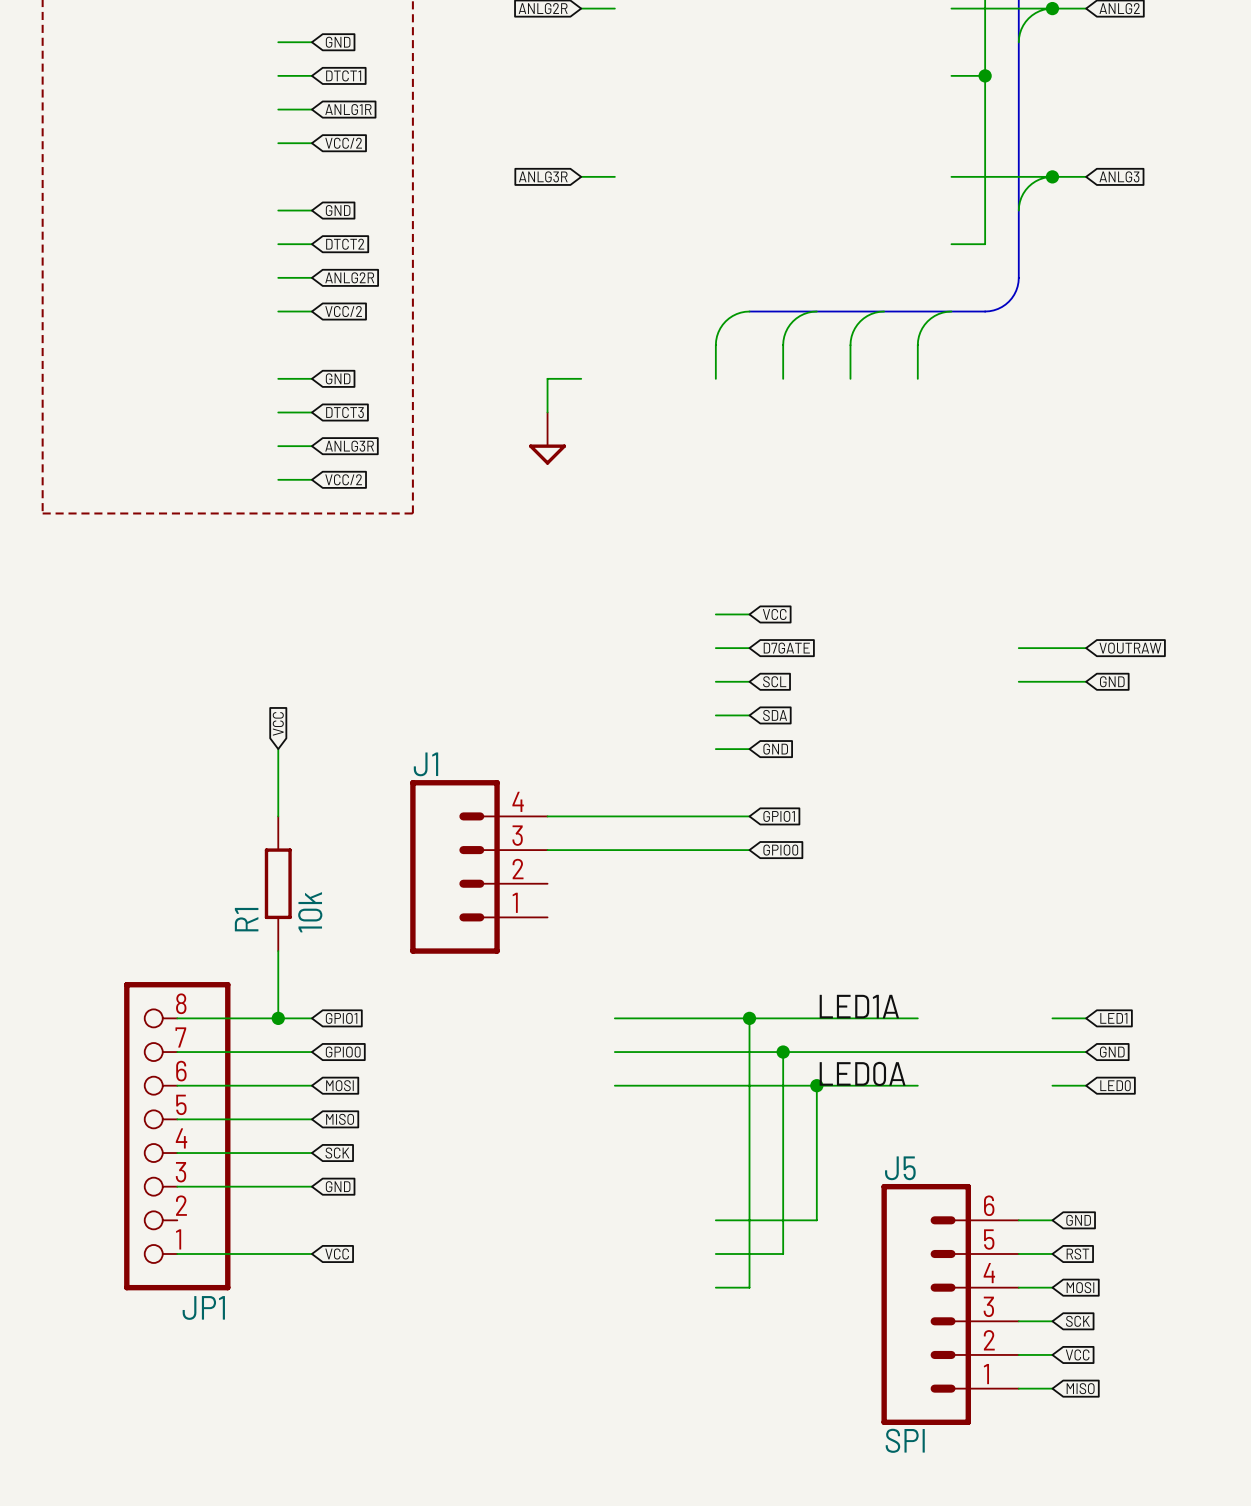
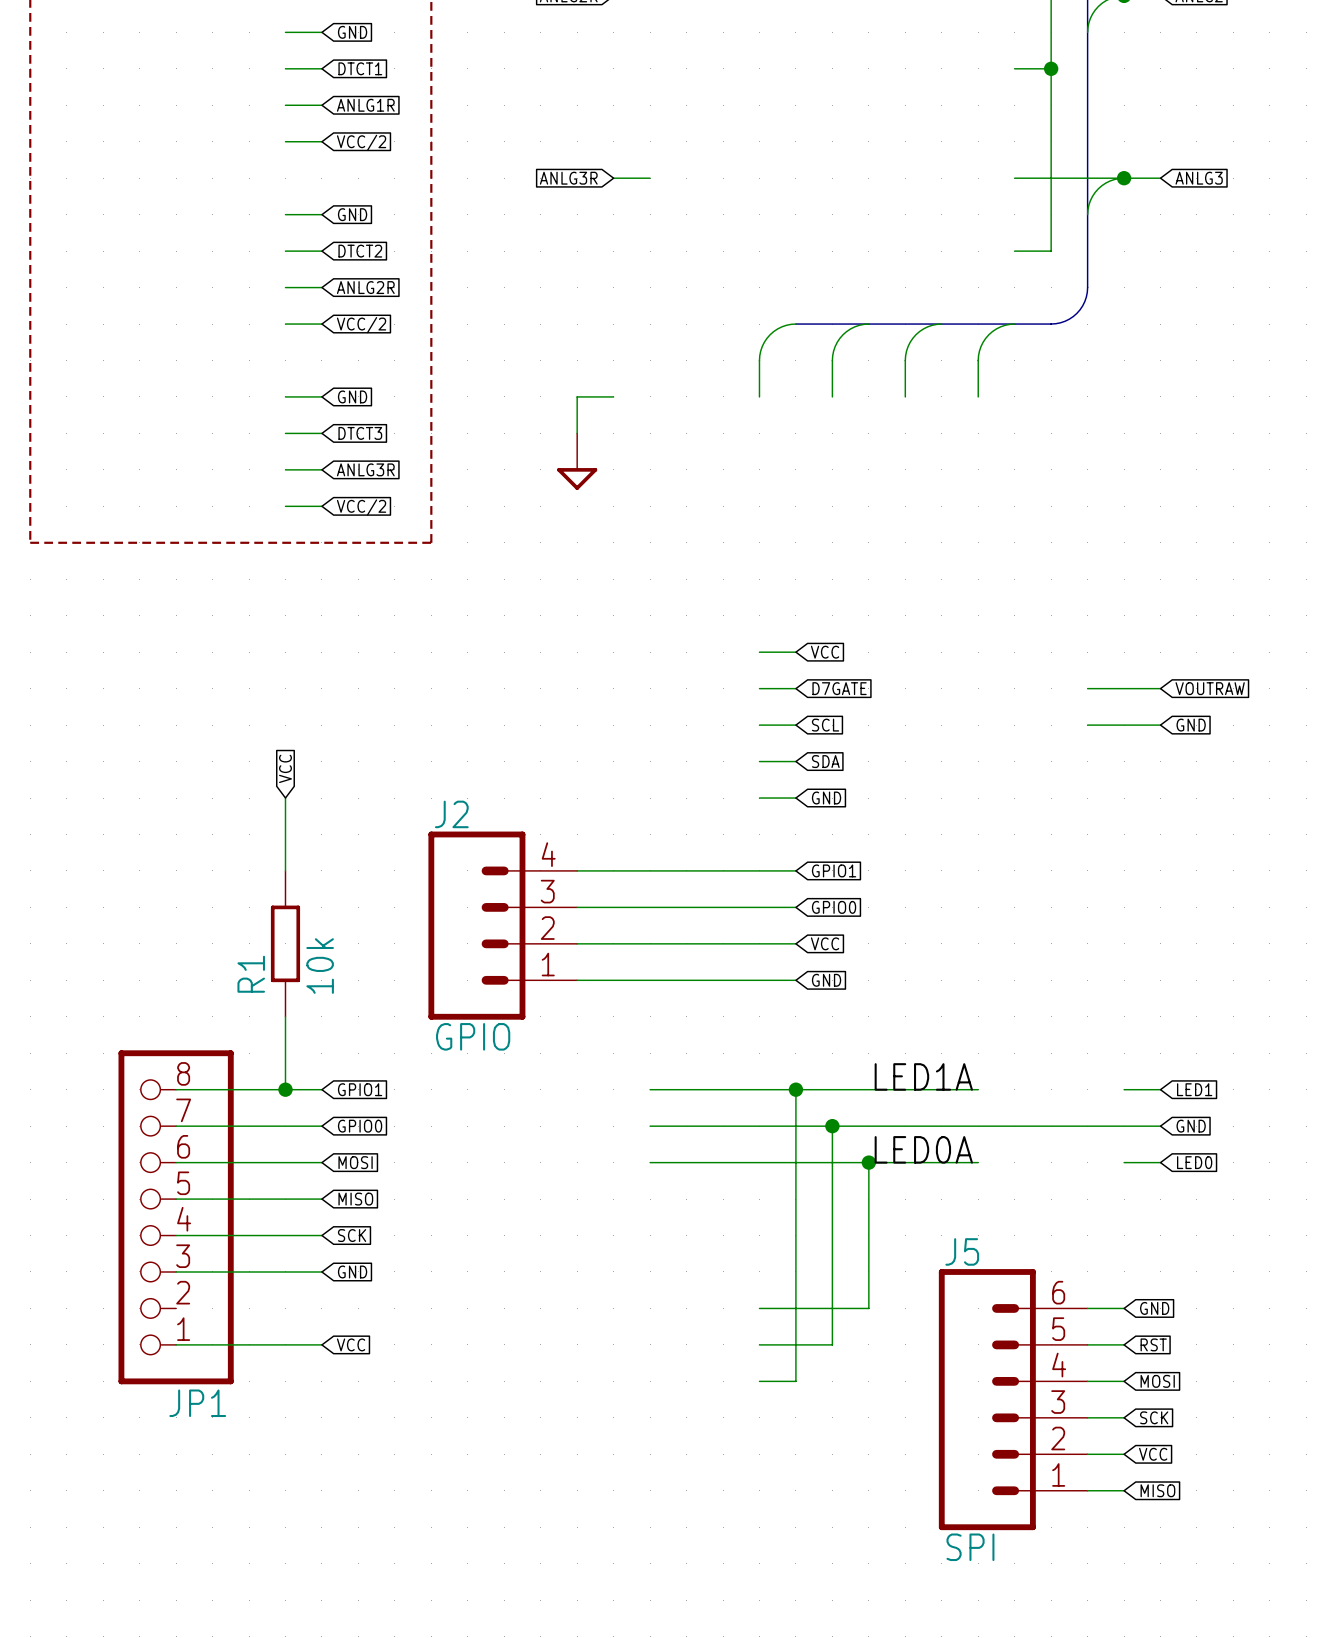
J1 name: J1 (425, 764) -> J2 (451, 814)
wire: none -> (577, 943) (795, 943)
global label: none -> VCC (825, 943)
wire: none -> (577, 980) (795, 980)
global label: none -> GND (826, 980)
J1 value: none -> GPIO (473, 1036)

